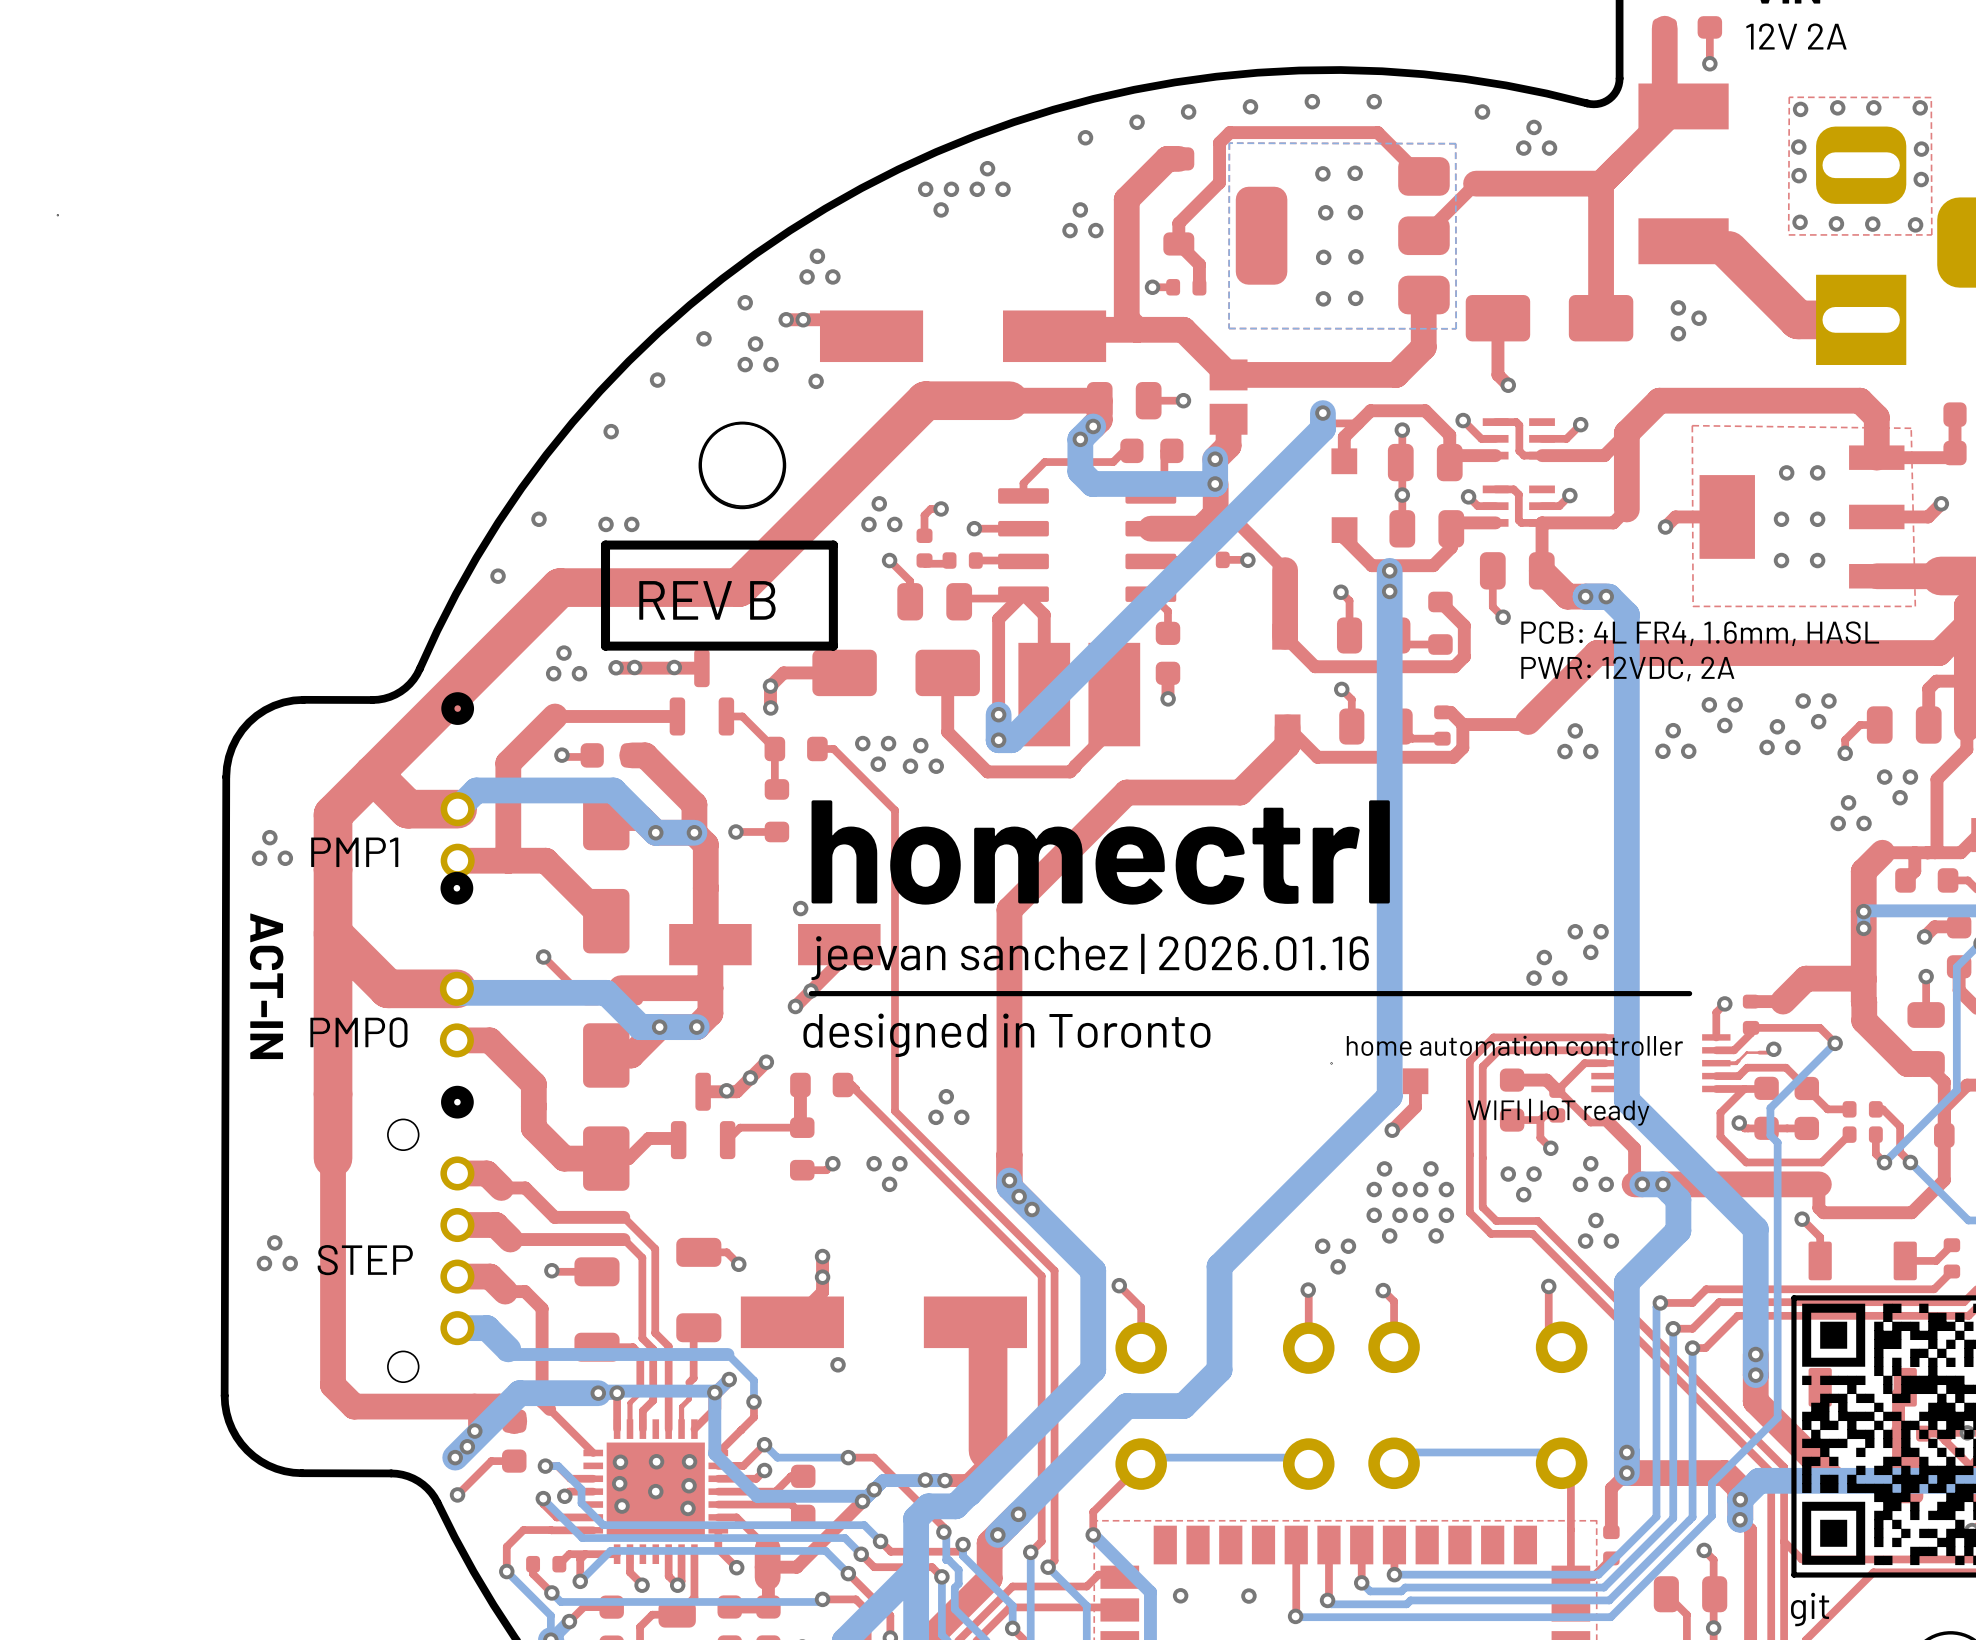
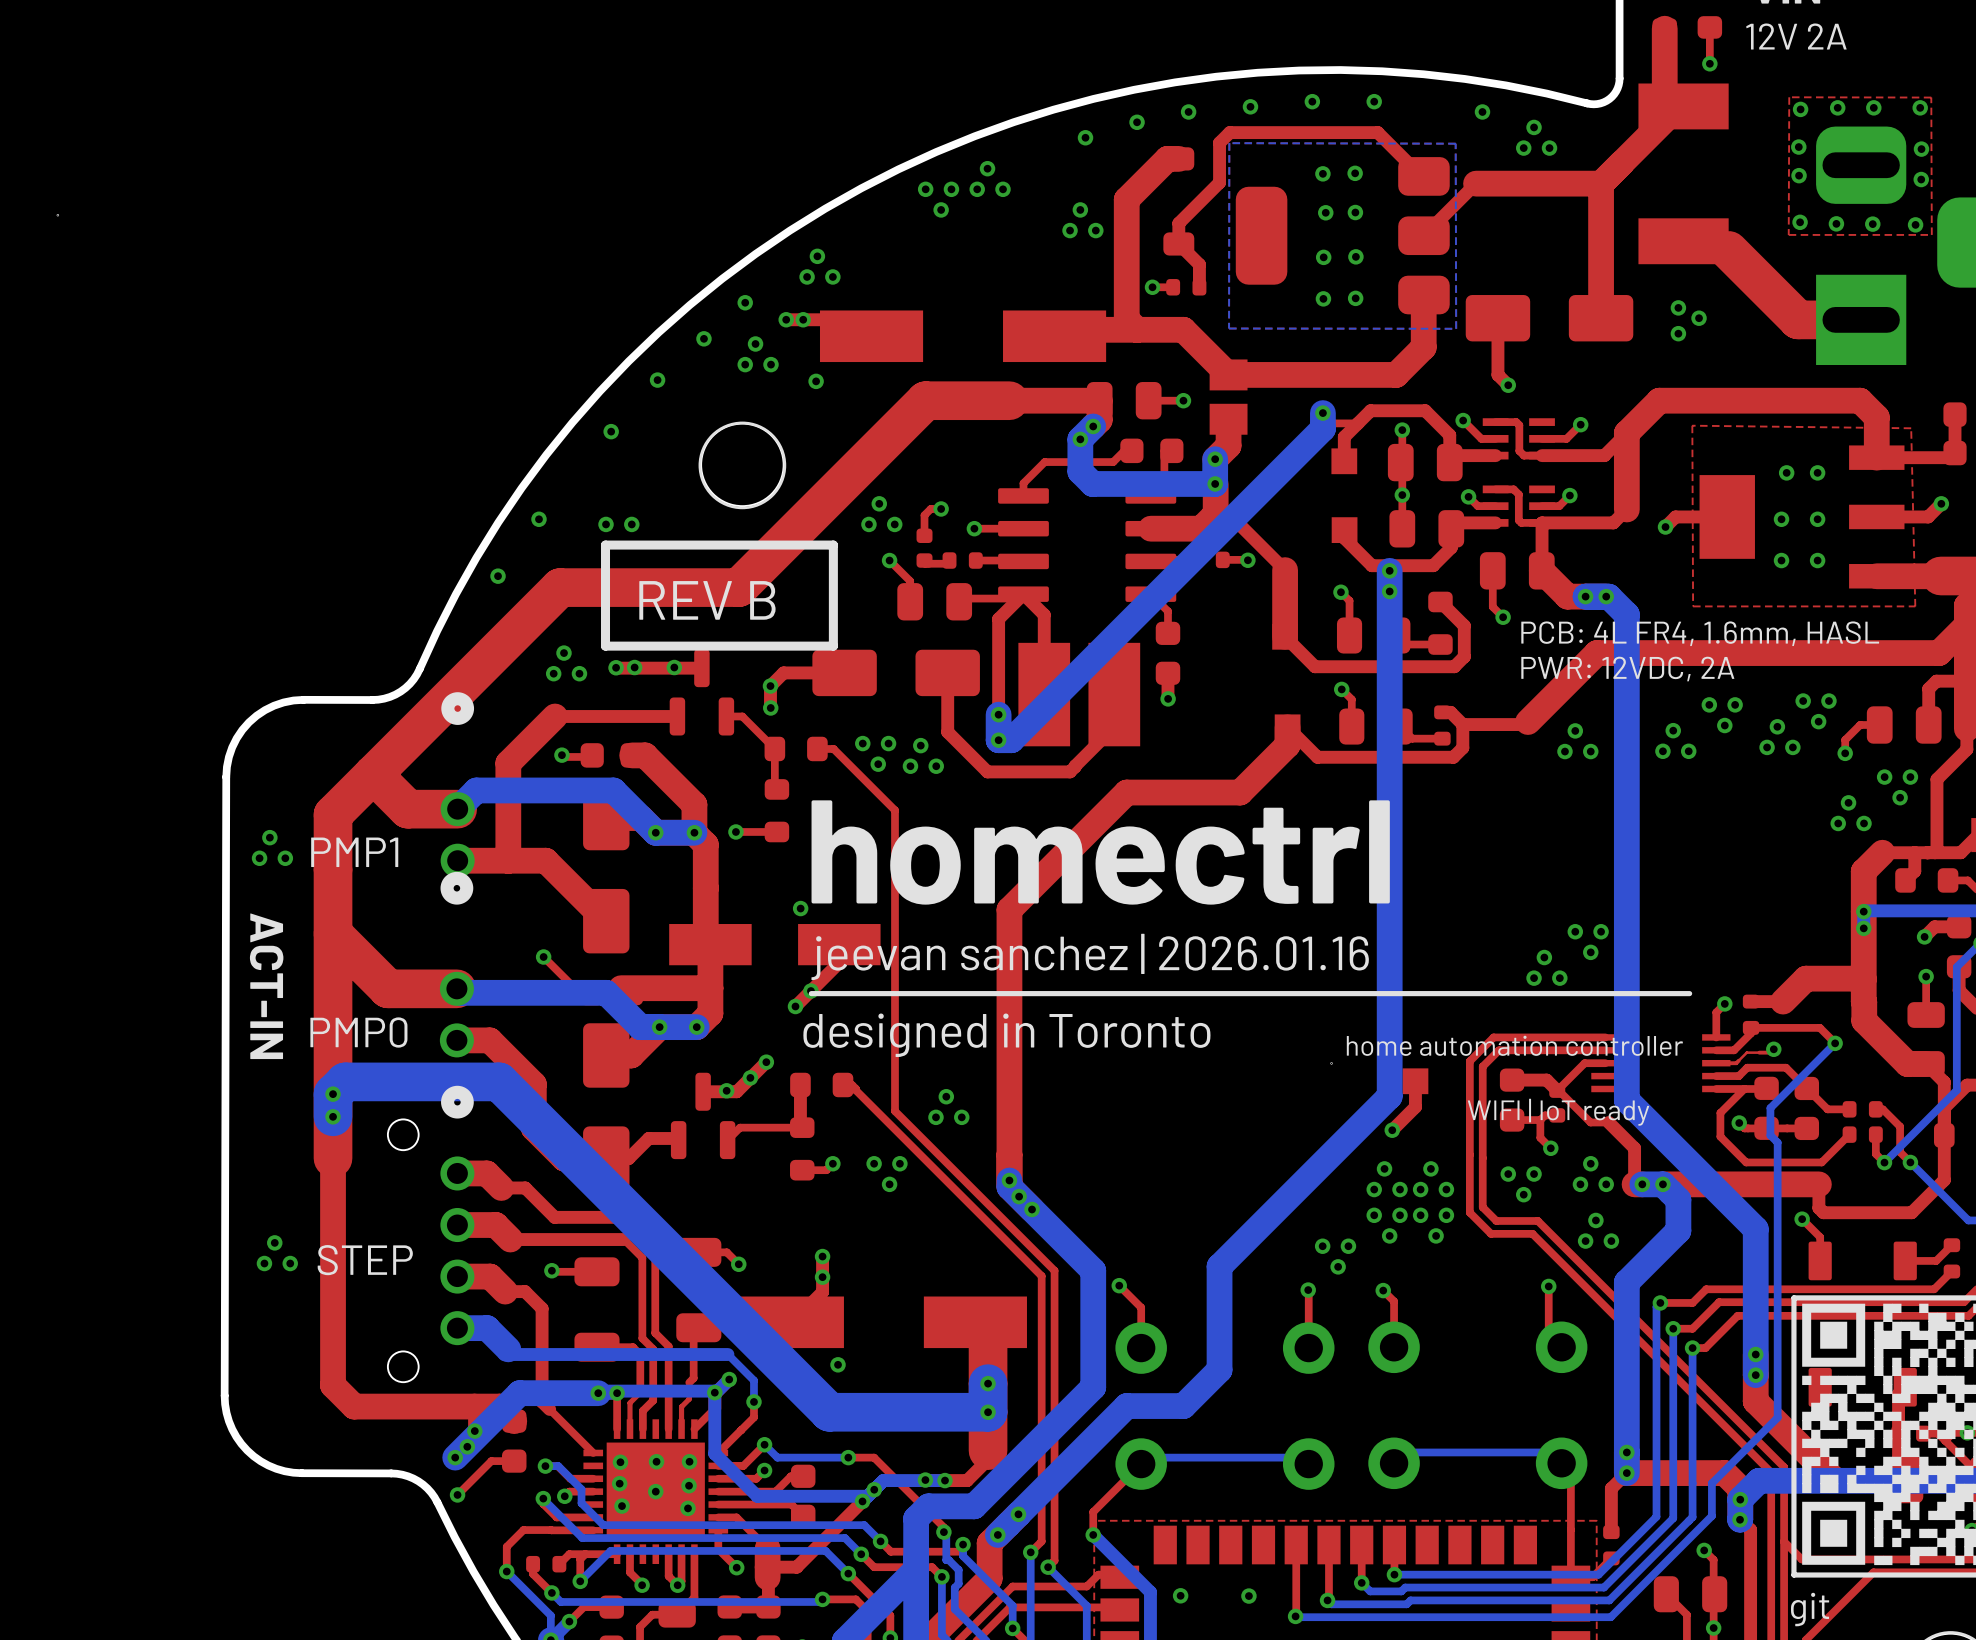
via: none -> (333, 1094)
bottom track: none -> (333, 1116) (333, 1094) (345, 1081) (499, 1081) (829, 1412) (988, 1412) (988, 1383)
via: none -> (333, 1116)
bottom track: (1093, 1369) (955, 1506) -> (1093, 1369) (1093, 1387) (974, 1506) (955, 1506)
via: none -> (988, 1383)
via: none -> (988, 1412)

